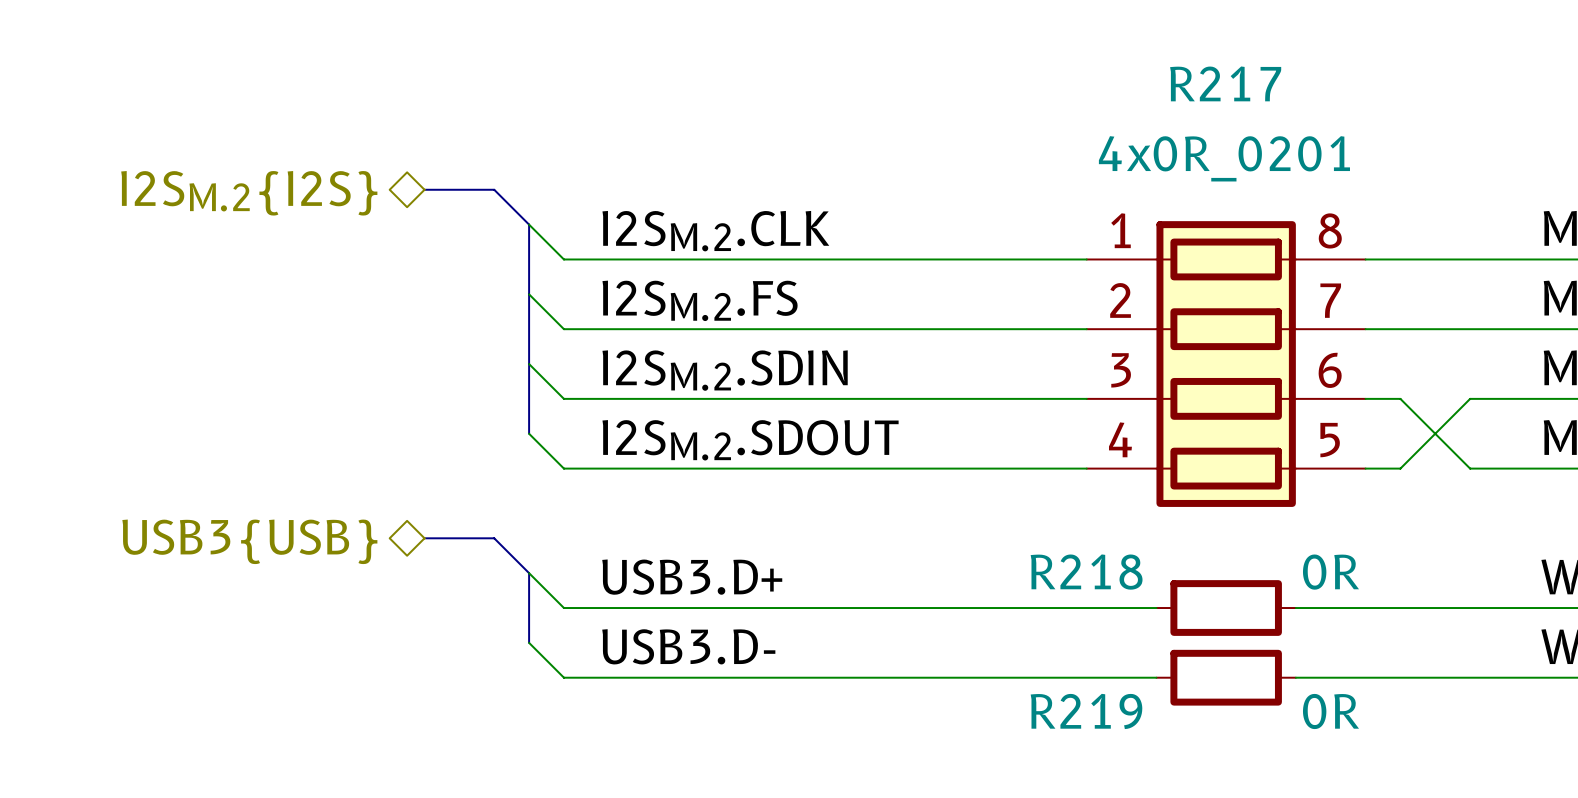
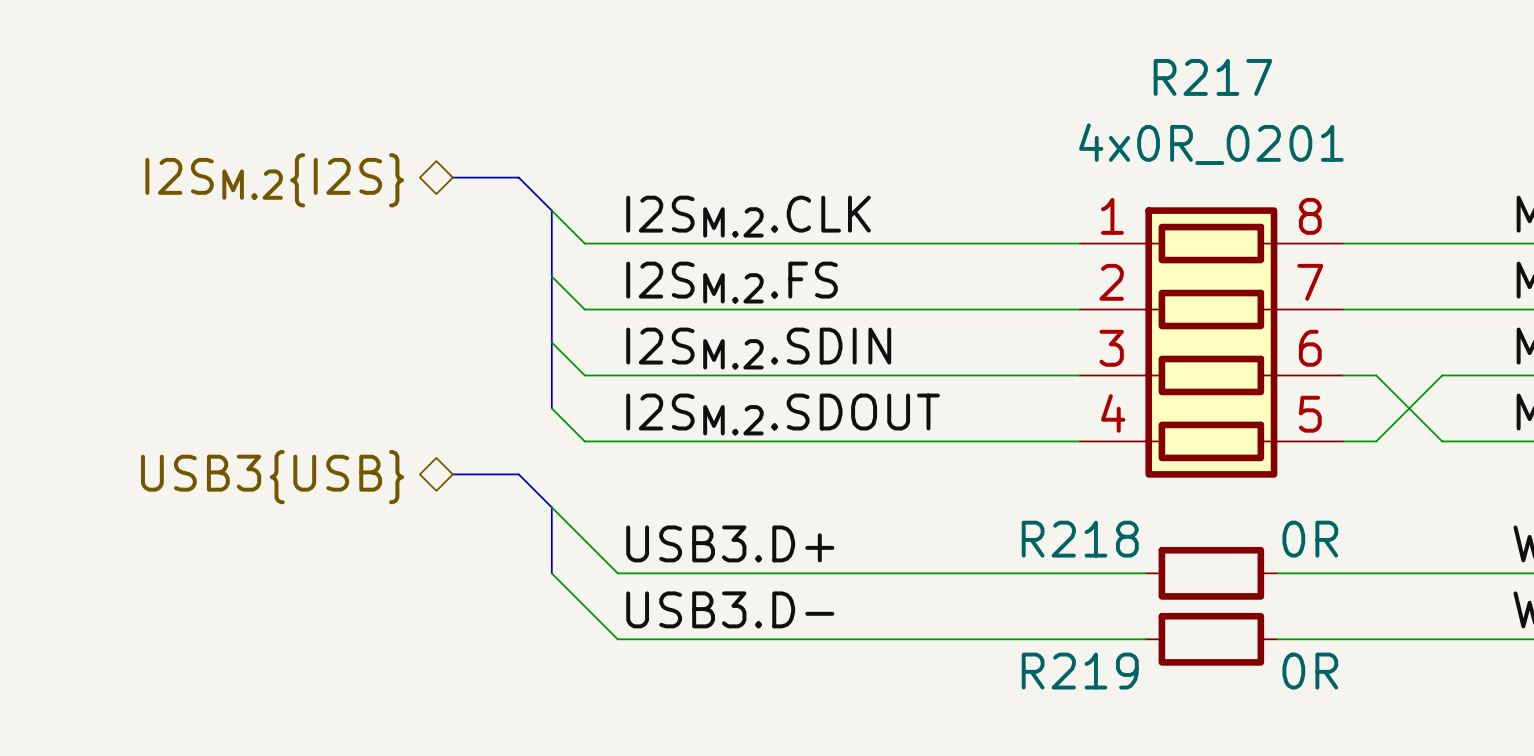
bus: (424, 538) (494, 538) (529, 573) -> (452, 474) (518, 474) (551, 507) (551, 540)
hierarchical label position: USB3{USB} (249, 541) -> USB3{USB} (272, 477)
wire: (529, 573) (563, 608) (598, 608) -> (551, 507) (617, 573)
bus: (529, 608) (529, 642) -> none
wire: (529, 642) (563, 677) (598, 677) -> (551, 573) (617, 639)

